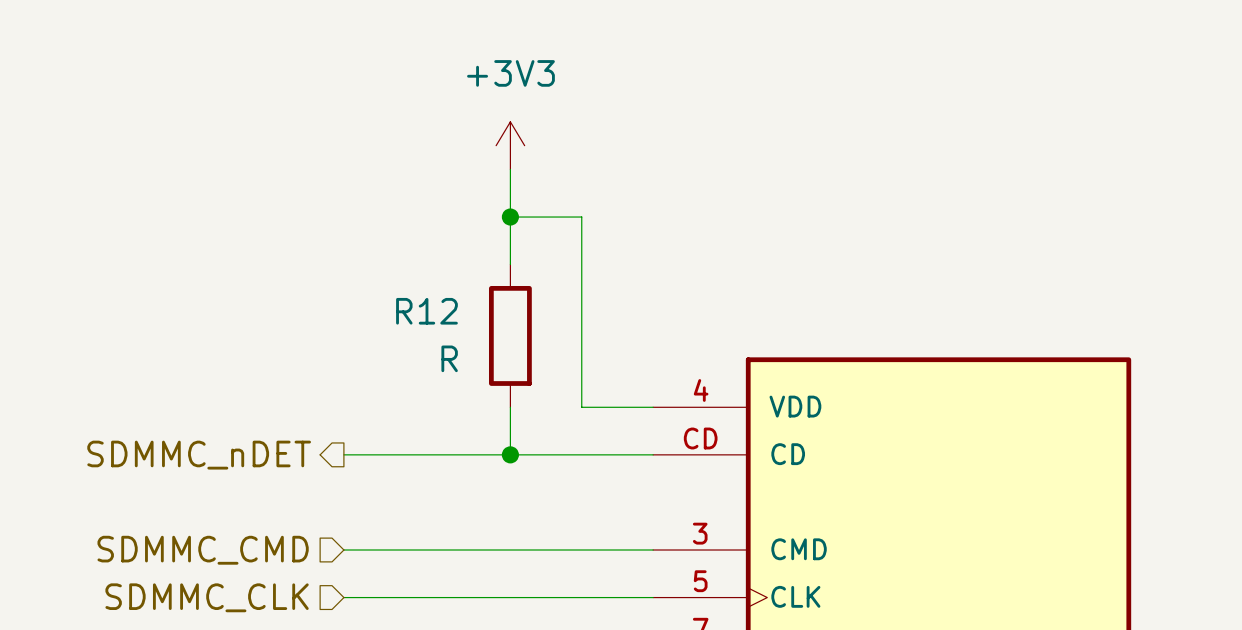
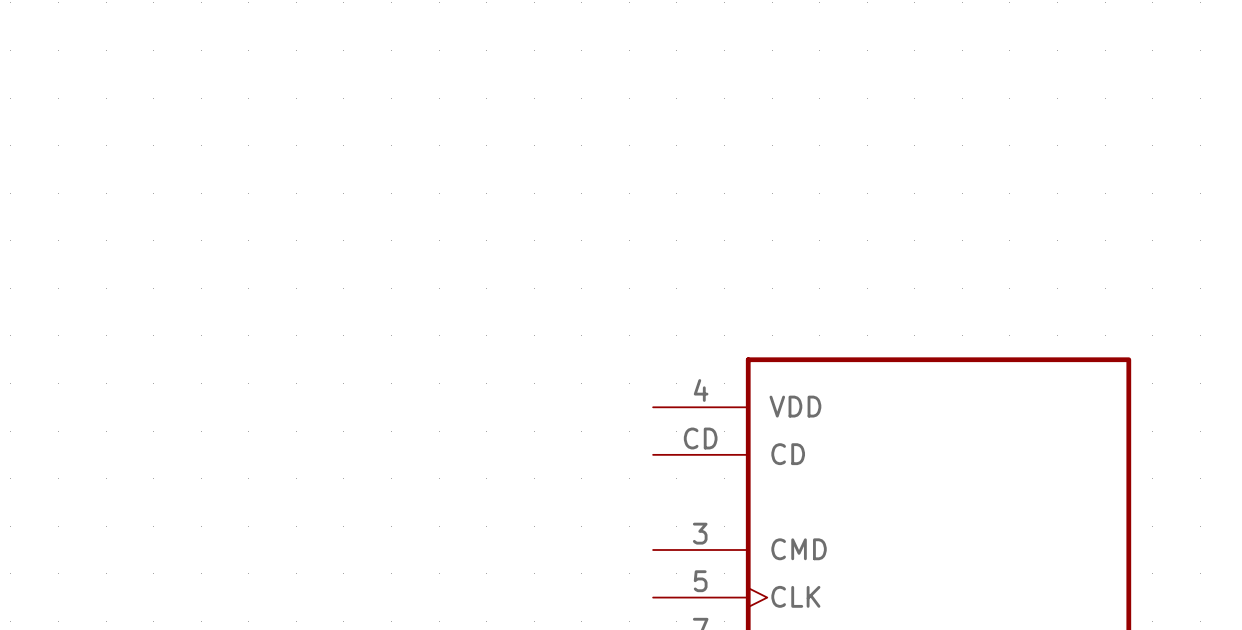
power symbol: +3V3 (510, 145) -> none
wire: (510, 169) (510, 264) -> none
wire: (510, 217) (581, 217) (581, 407) (653, 407) -> none
junction: (510, 217) -> none
R12: R (510, 335) -> none
wire: (510, 407) (510, 454) -> none
wire: (343, 454) (653, 454) -> none
junction: (510, 454) -> none
hierarchical label: SDMMC_nDET (199, 455) -> none
hierarchical label: SDMMC_CMD (203, 550) -> none
wire: (343, 550) (653, 550) -> none
hierarchical label: SDMMC_CLK (207, 597) -> none
wire: (343, 597) (653, 597) -> none

